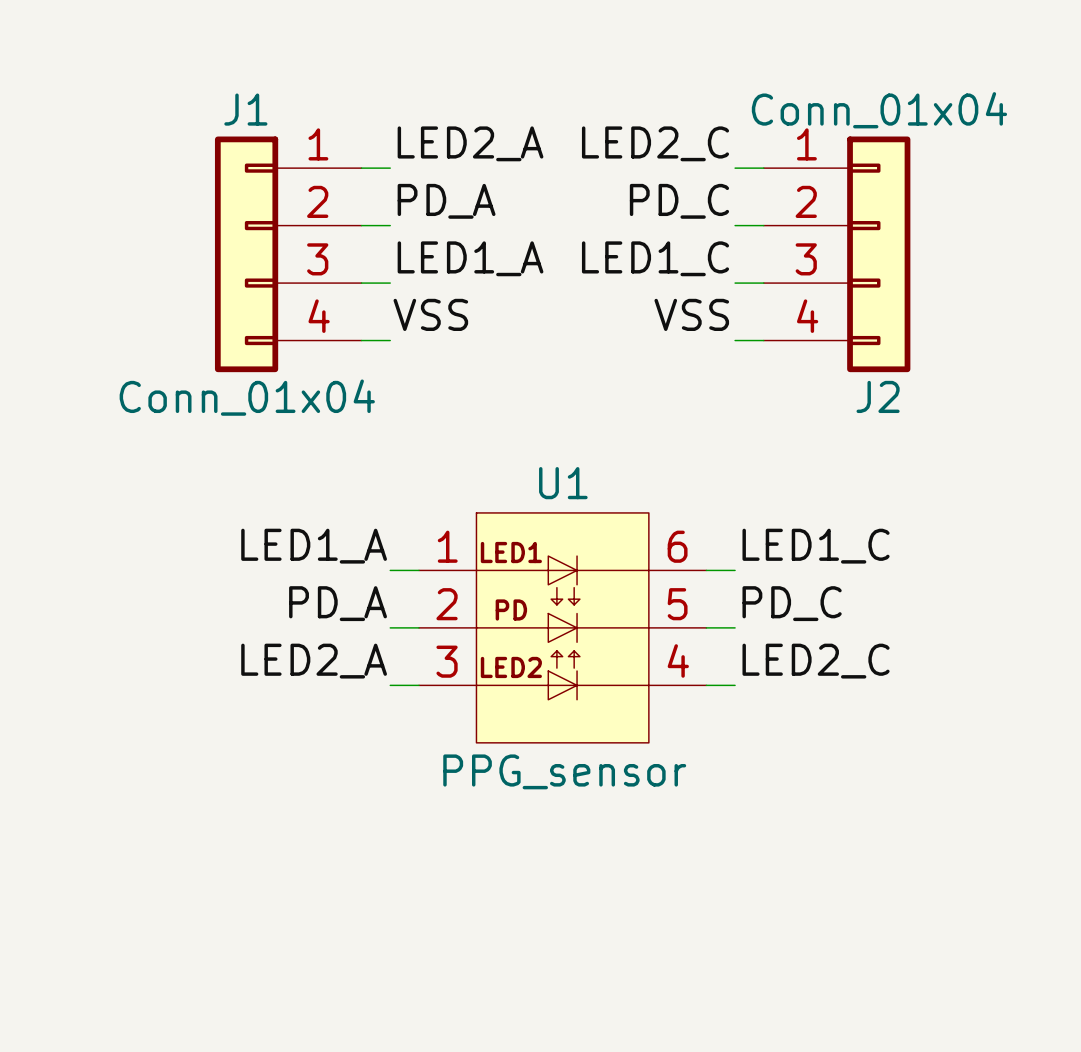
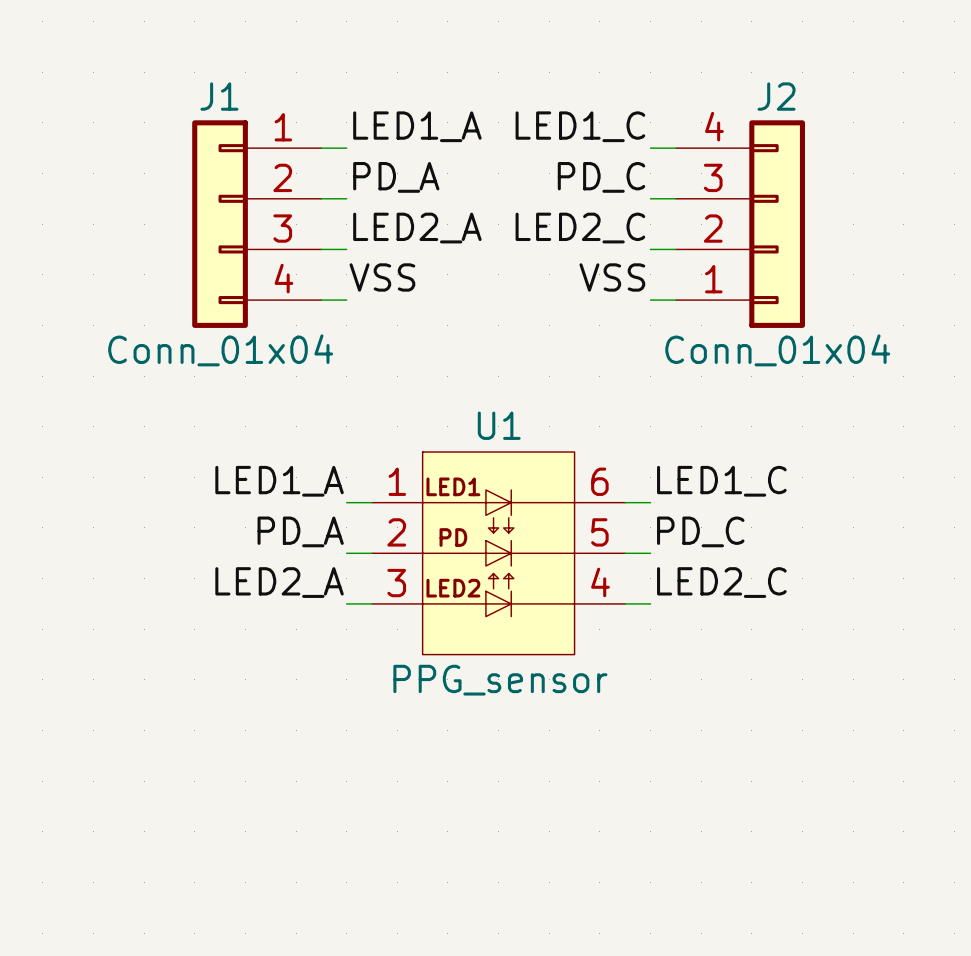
label: LED2_A (470, 143) -> LED1_A (417, 126)
label: LED2_C (655, 143) -> LED1_C (580, 126)
J2 flip: as is (878, 254) -> up-down (777, 224)
label: LED1_A (470, 258) -> LED2_A (417, 228)
label: LED1_C (655, 258) -> LED2_C (580, 228)

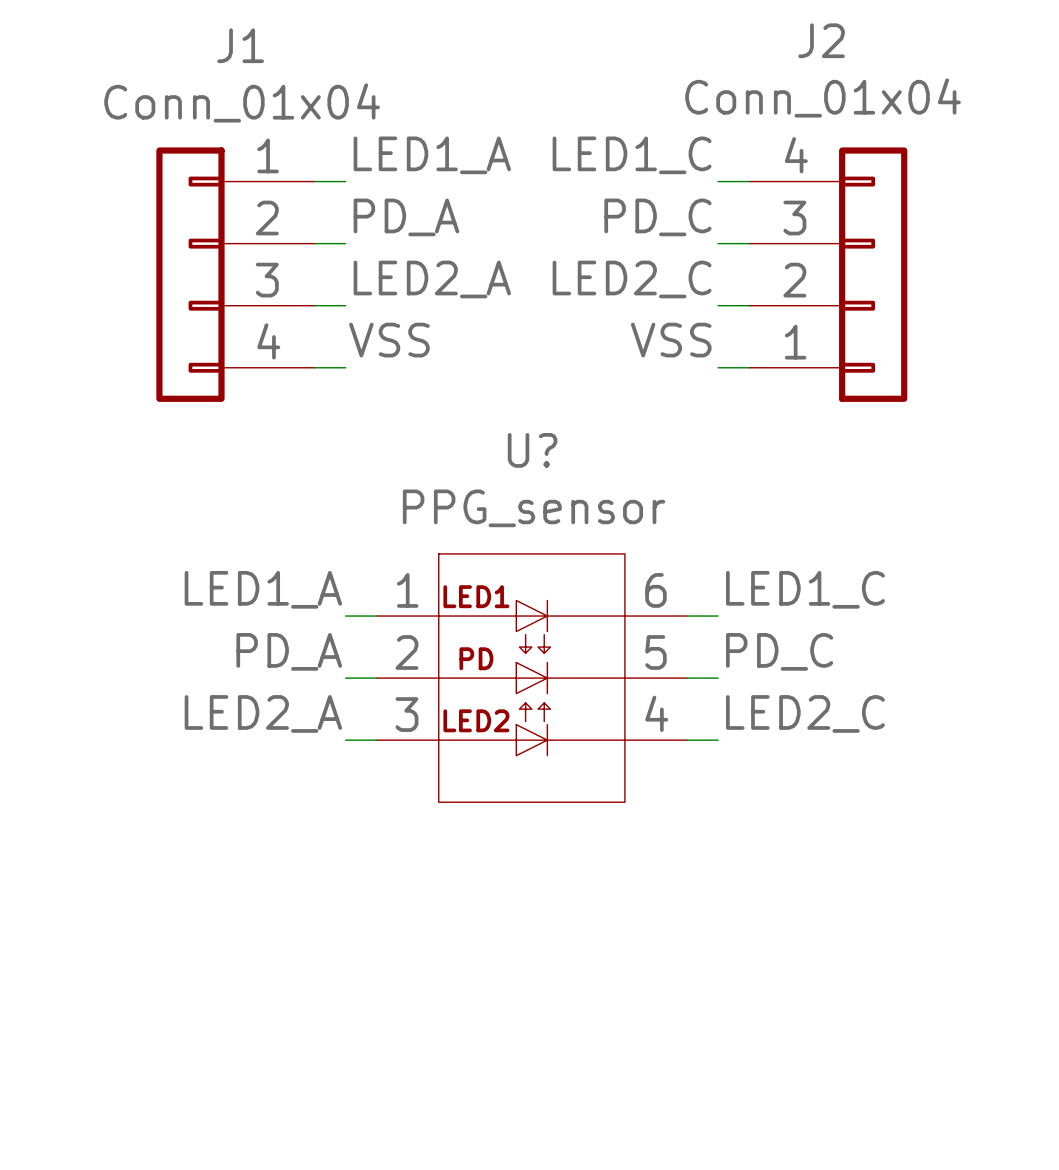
J1 name position: J1 (219, 96) -> J1 (240, 45)
J2 name position: J2 (776, 96) -> J2 (821, 40)
J1 value position: Conn_01x04 (220, 350) -> Conn_01x04 (242, 102)
J2 value position: Conn_01x04 (777, 350) -> Conn_01x04 (823, 97)
U1 name: U1 (499, 425) -> U? (532, 450)
U1 value position: PPG_sensor (500, 680) -> PPG_sensor (534, 508)

